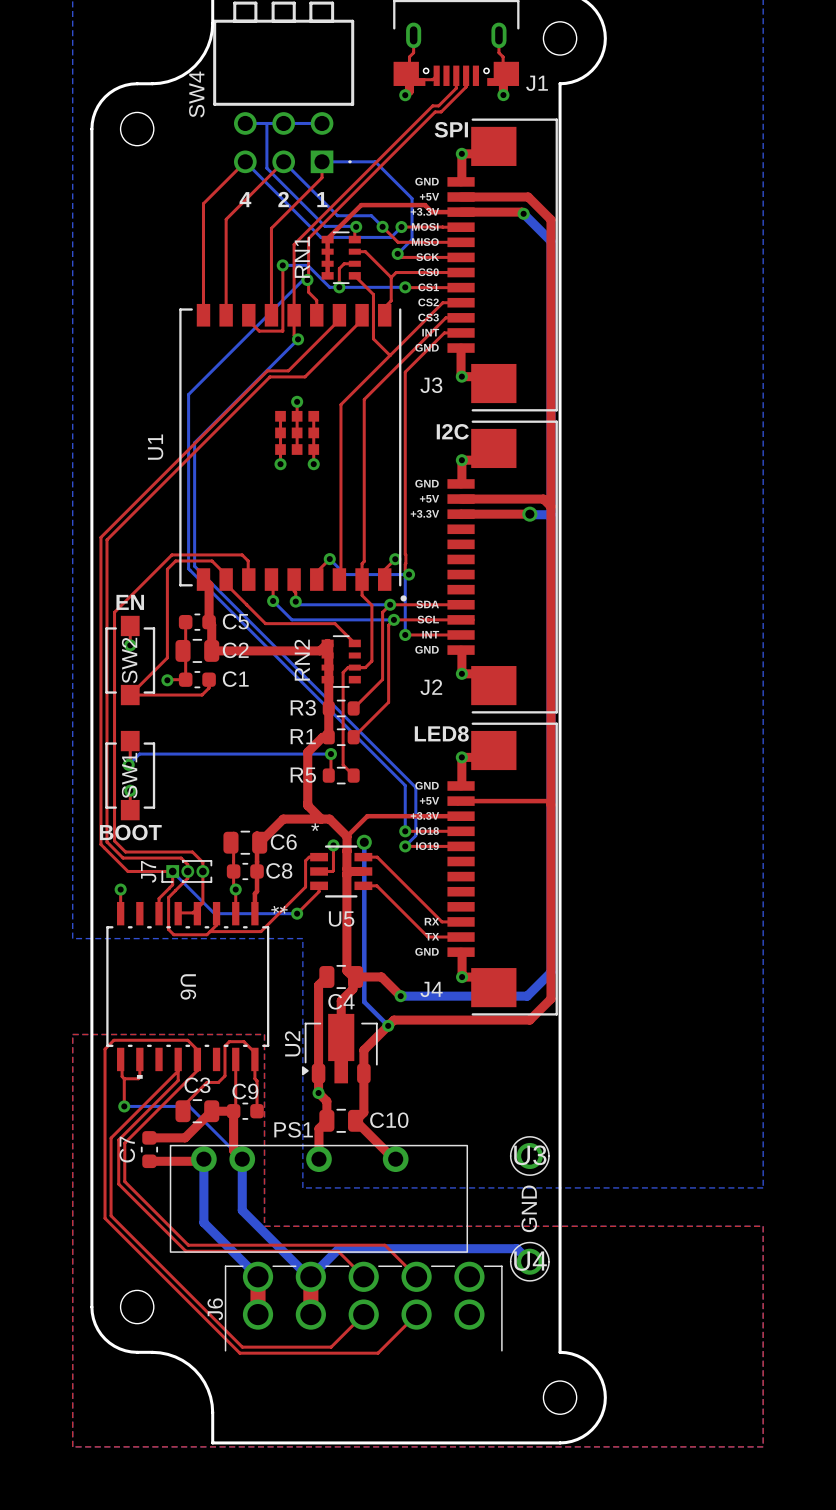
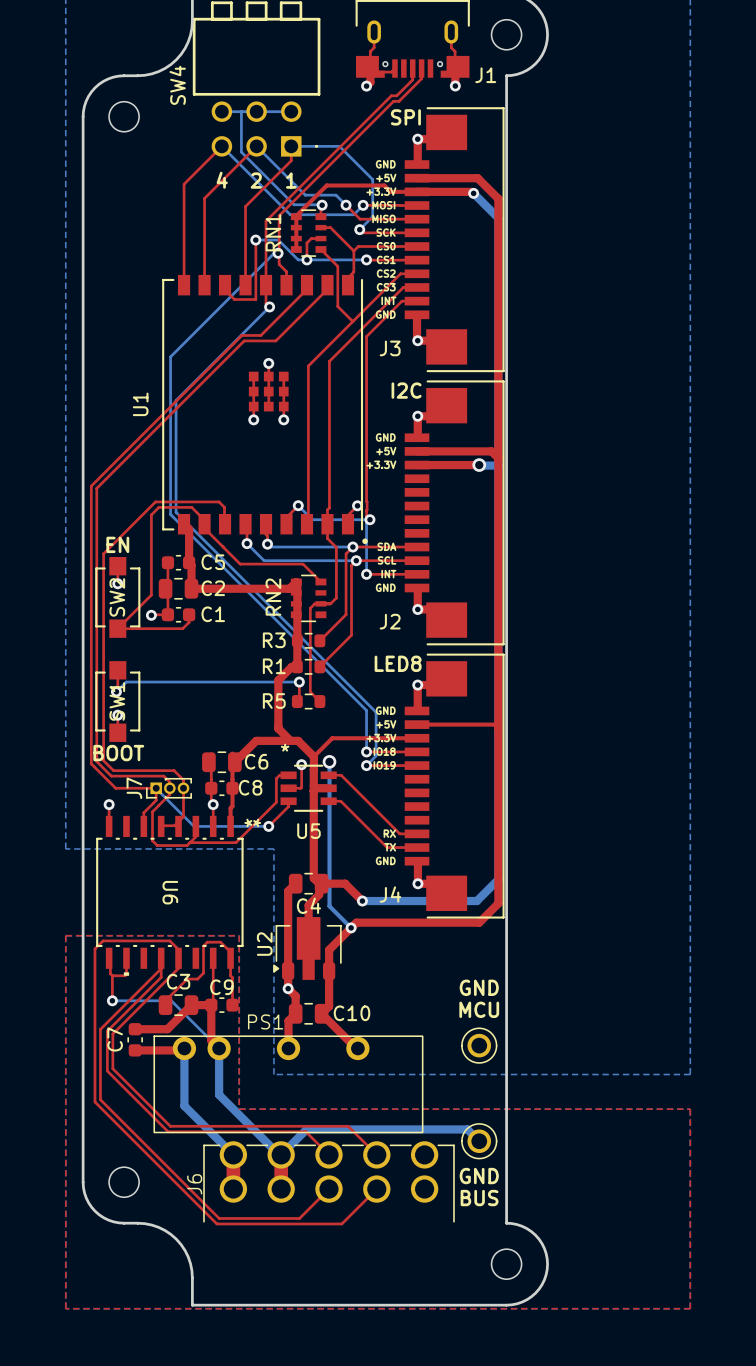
text: none -> GND (479, 987)
text: none -> MCU (479, 1009)
U3 name: U3 (530, 1155) -> none
text: GND (529, 1208) -> none
U4 name: U4 (530, 1261) -> none
text: none -> GND (479, 1176)
text: none -> BUS (479, 1198)

